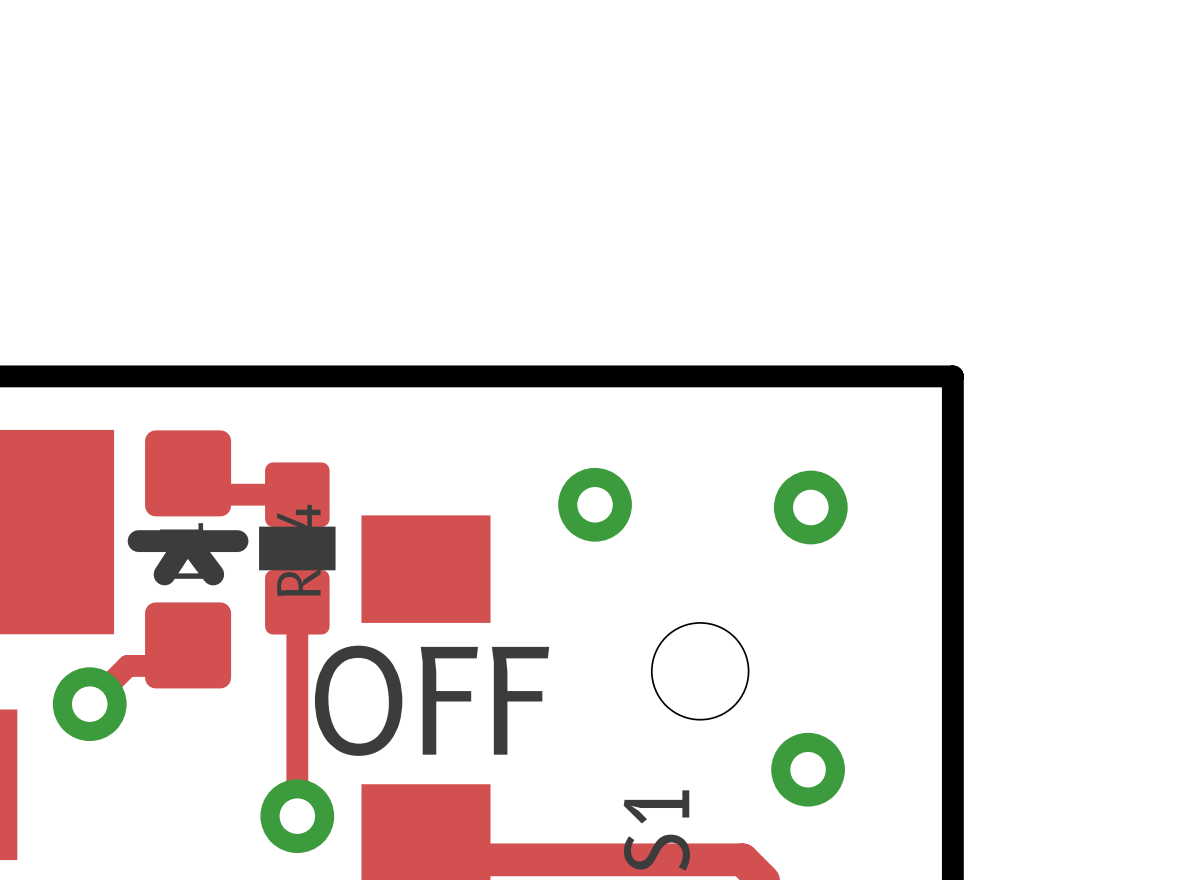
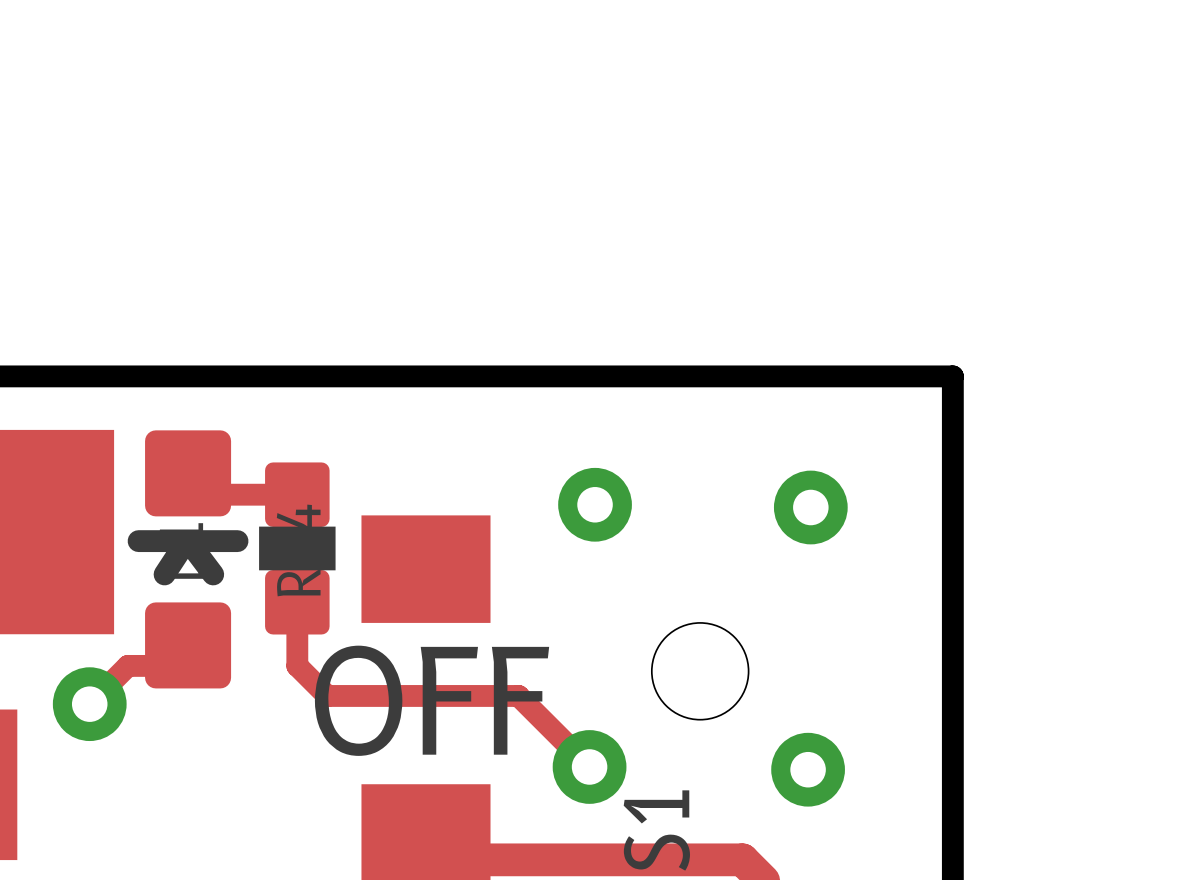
track: (297, 665) (297, 816) -> (297, 665) (327, 695) (518, 695) (589, 766)
via position: (297, 816) -> (589, 766)

